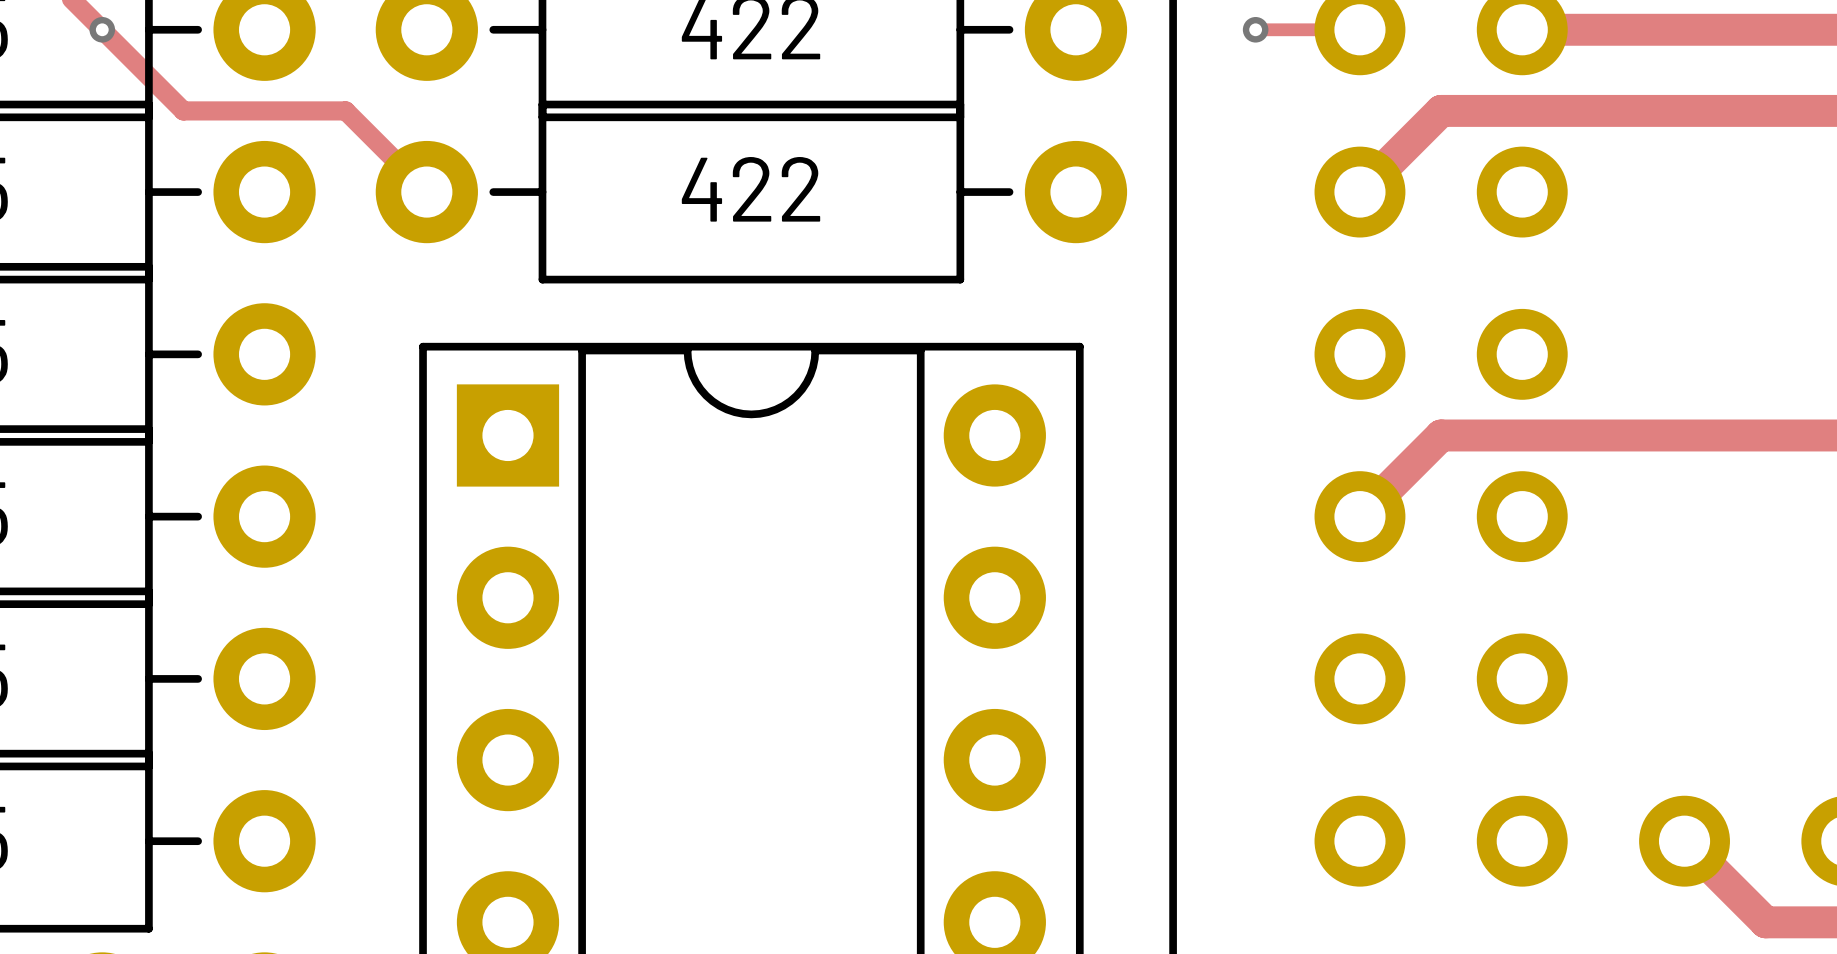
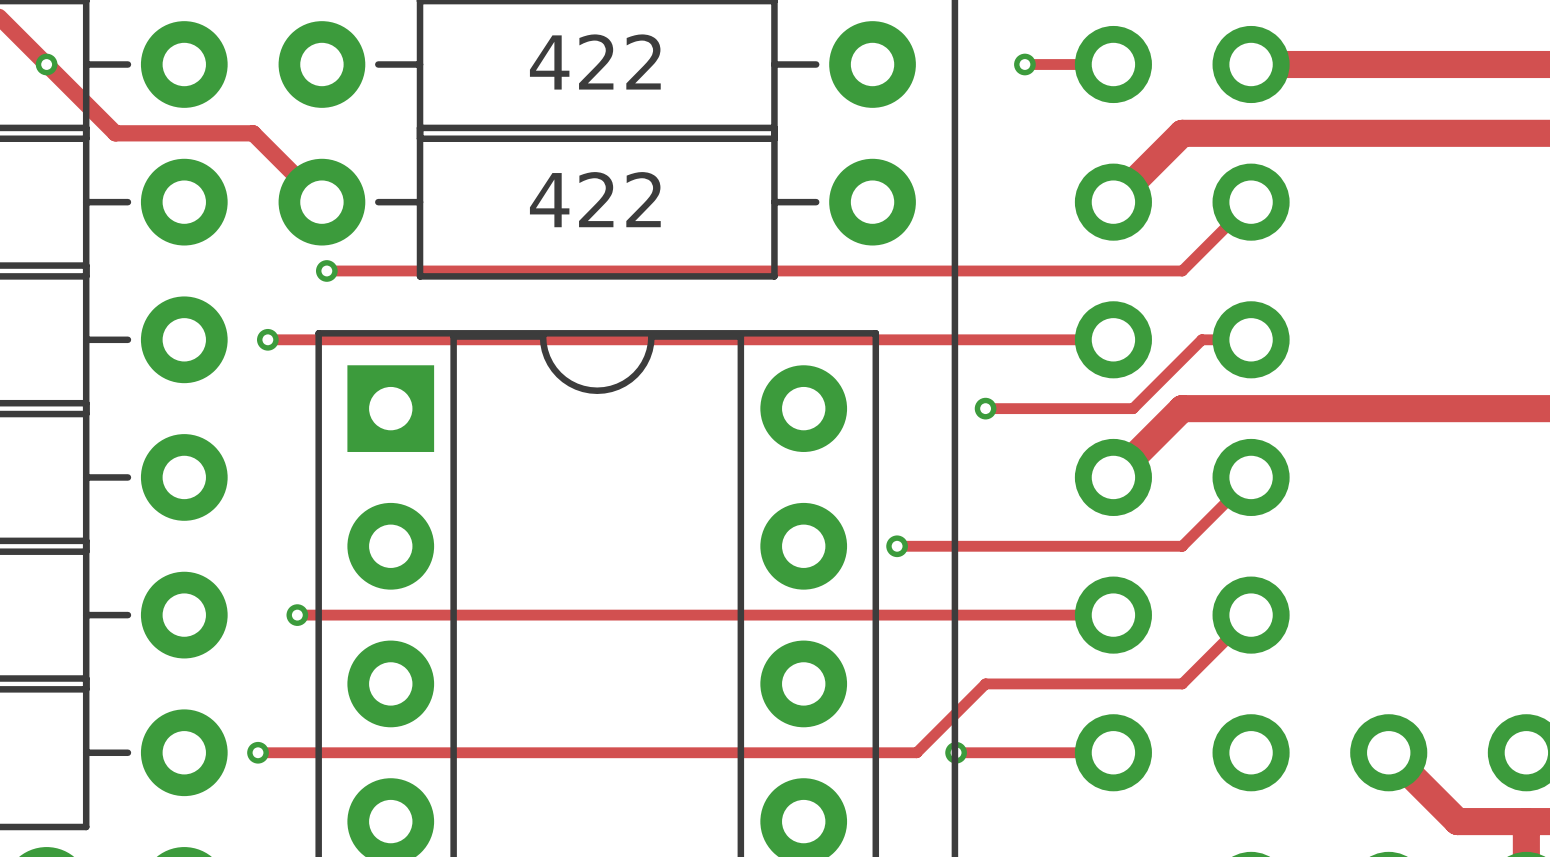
track: none -> (1251, 202) (1182, 270) (326, 270)
via: none -> (326, 270)
track: none -> (267, 339) (1113, 339)
via: none -> (267, 339)
track: none -> (1251, 339) (1201, 339) (1133, 408) (985, 408)
via: none -> (985, 408)
track: none -> (1251, 477) (1182, 546) (897, 546)
via: none -> (897, 546)
track: none -> (297, 615) (1113, 615)
via: none -> (297, 615)
track: none -> (1251, 615) (1182, 683) (985, 683) (916, 752) (258, 752)
via: none -> (258, 752)
track: none -> (956, 752) (1113, 752)
via: none -> (956, 752)

